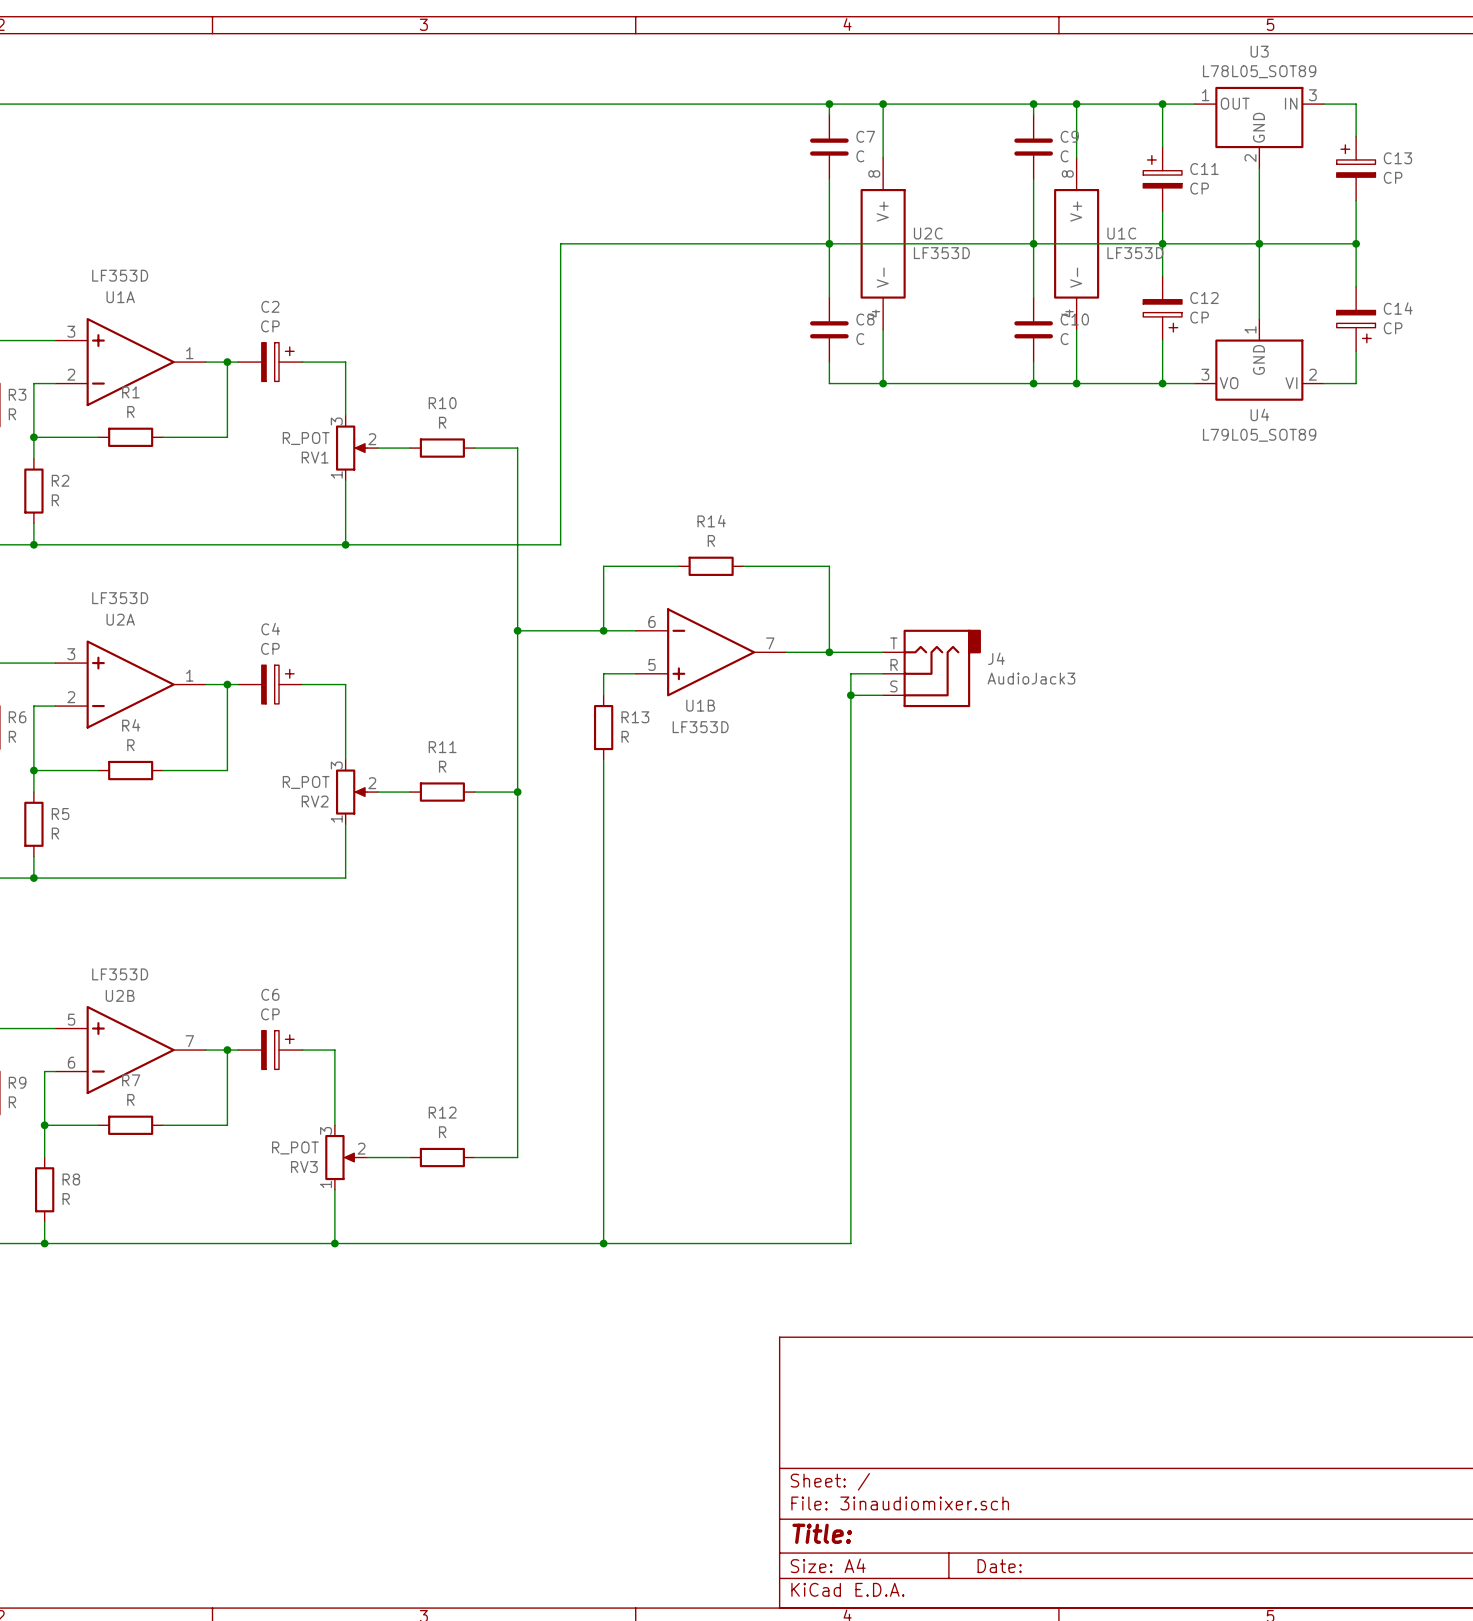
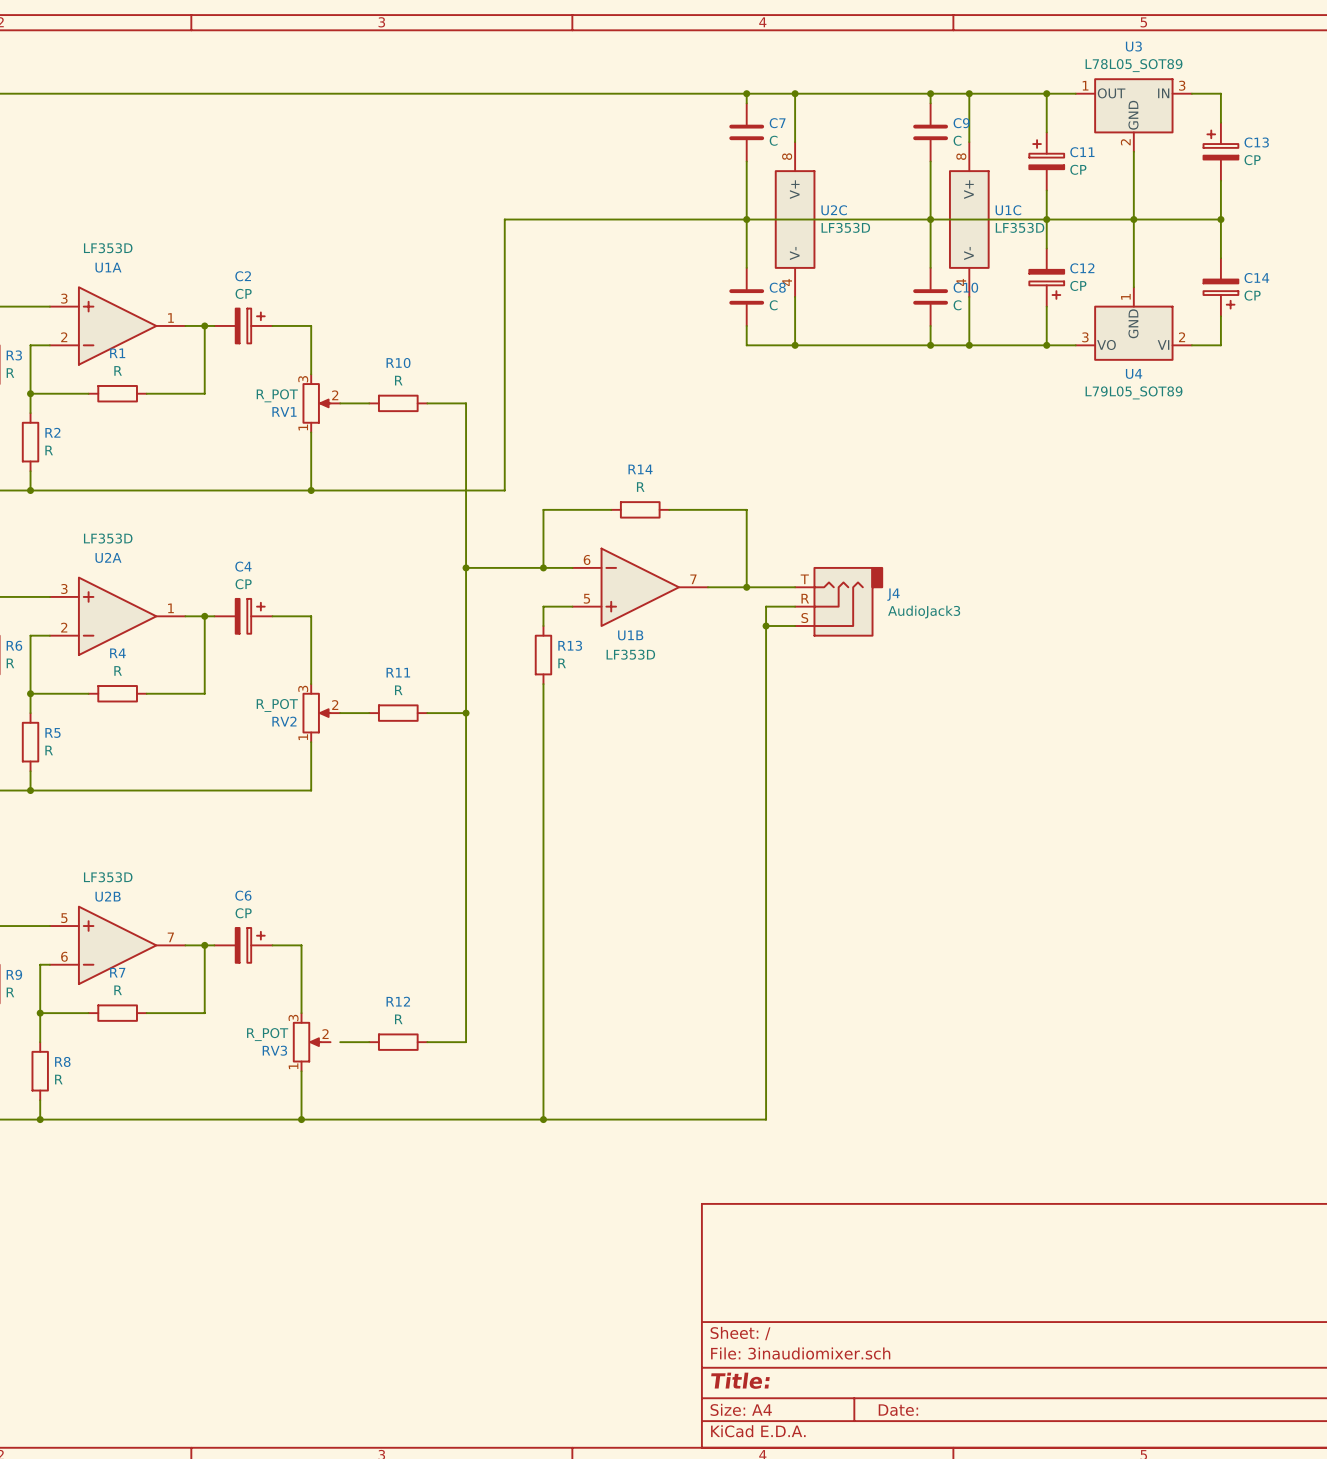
wire: (367, 1157) (377, 1157) -> none

